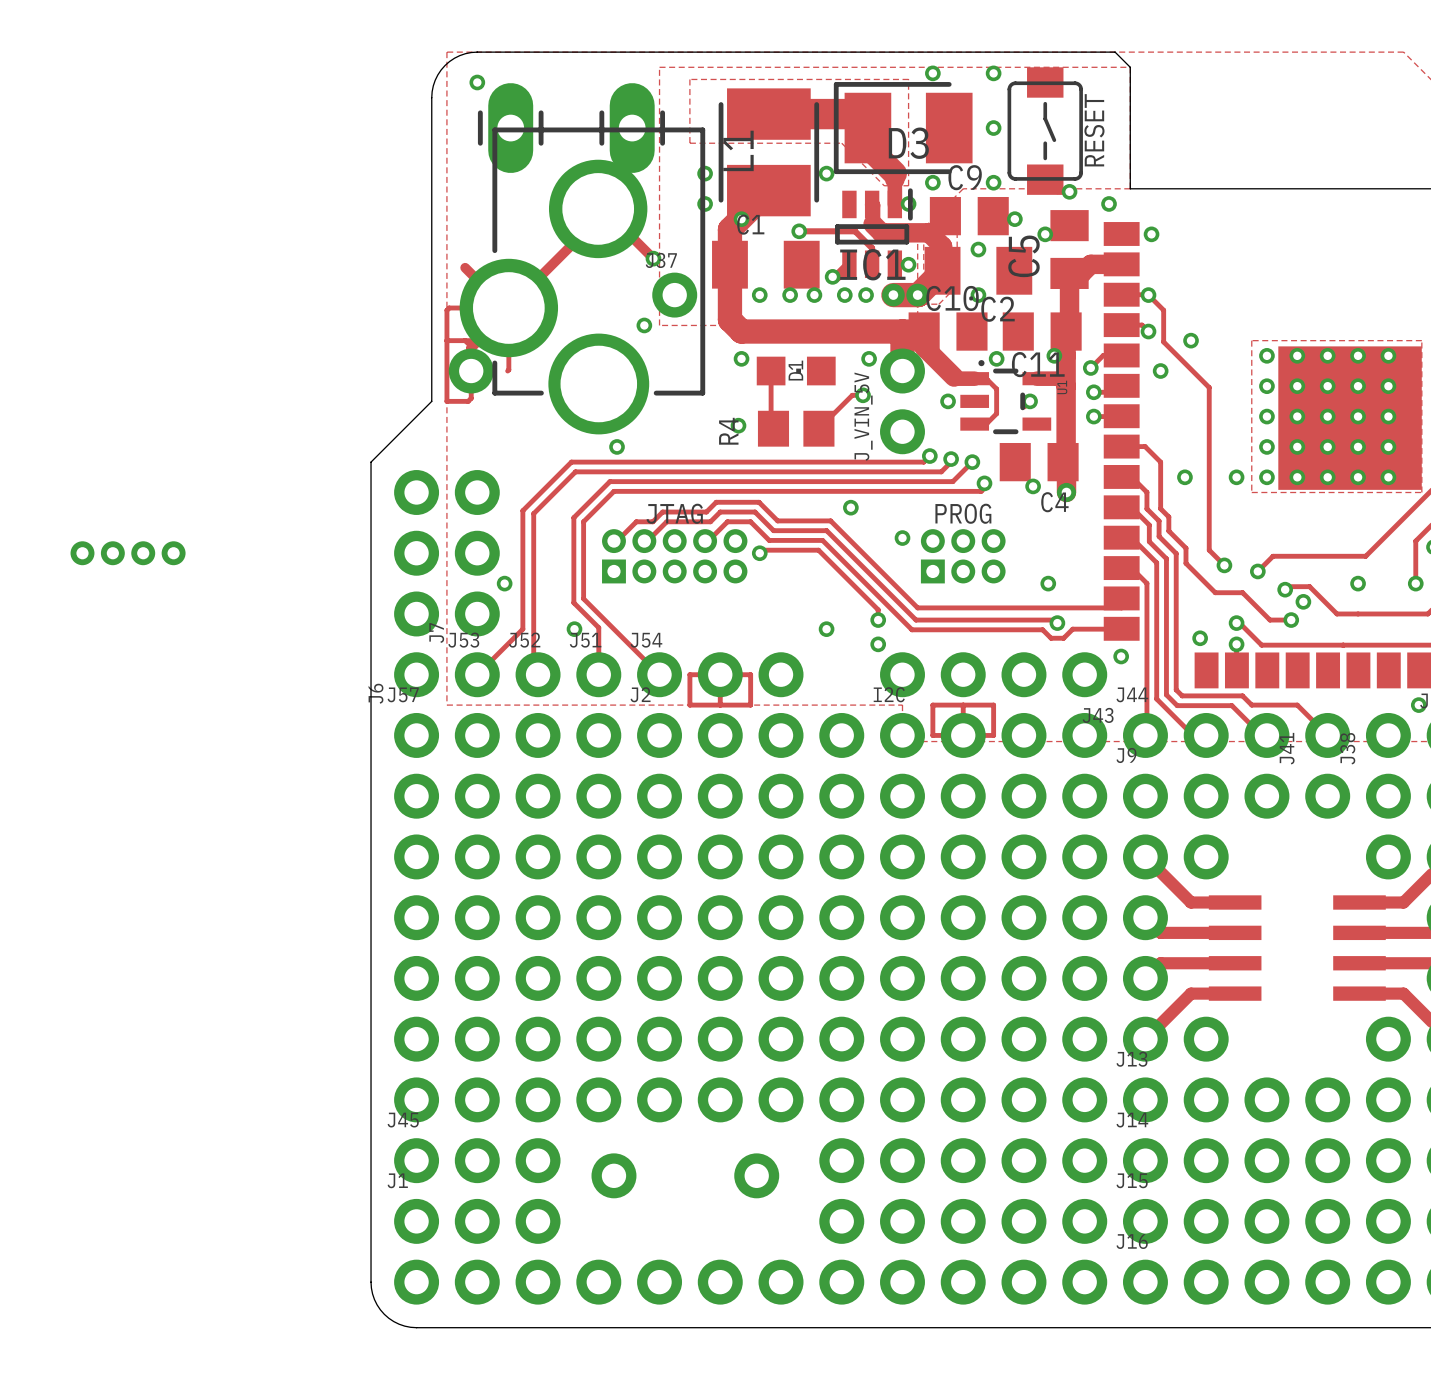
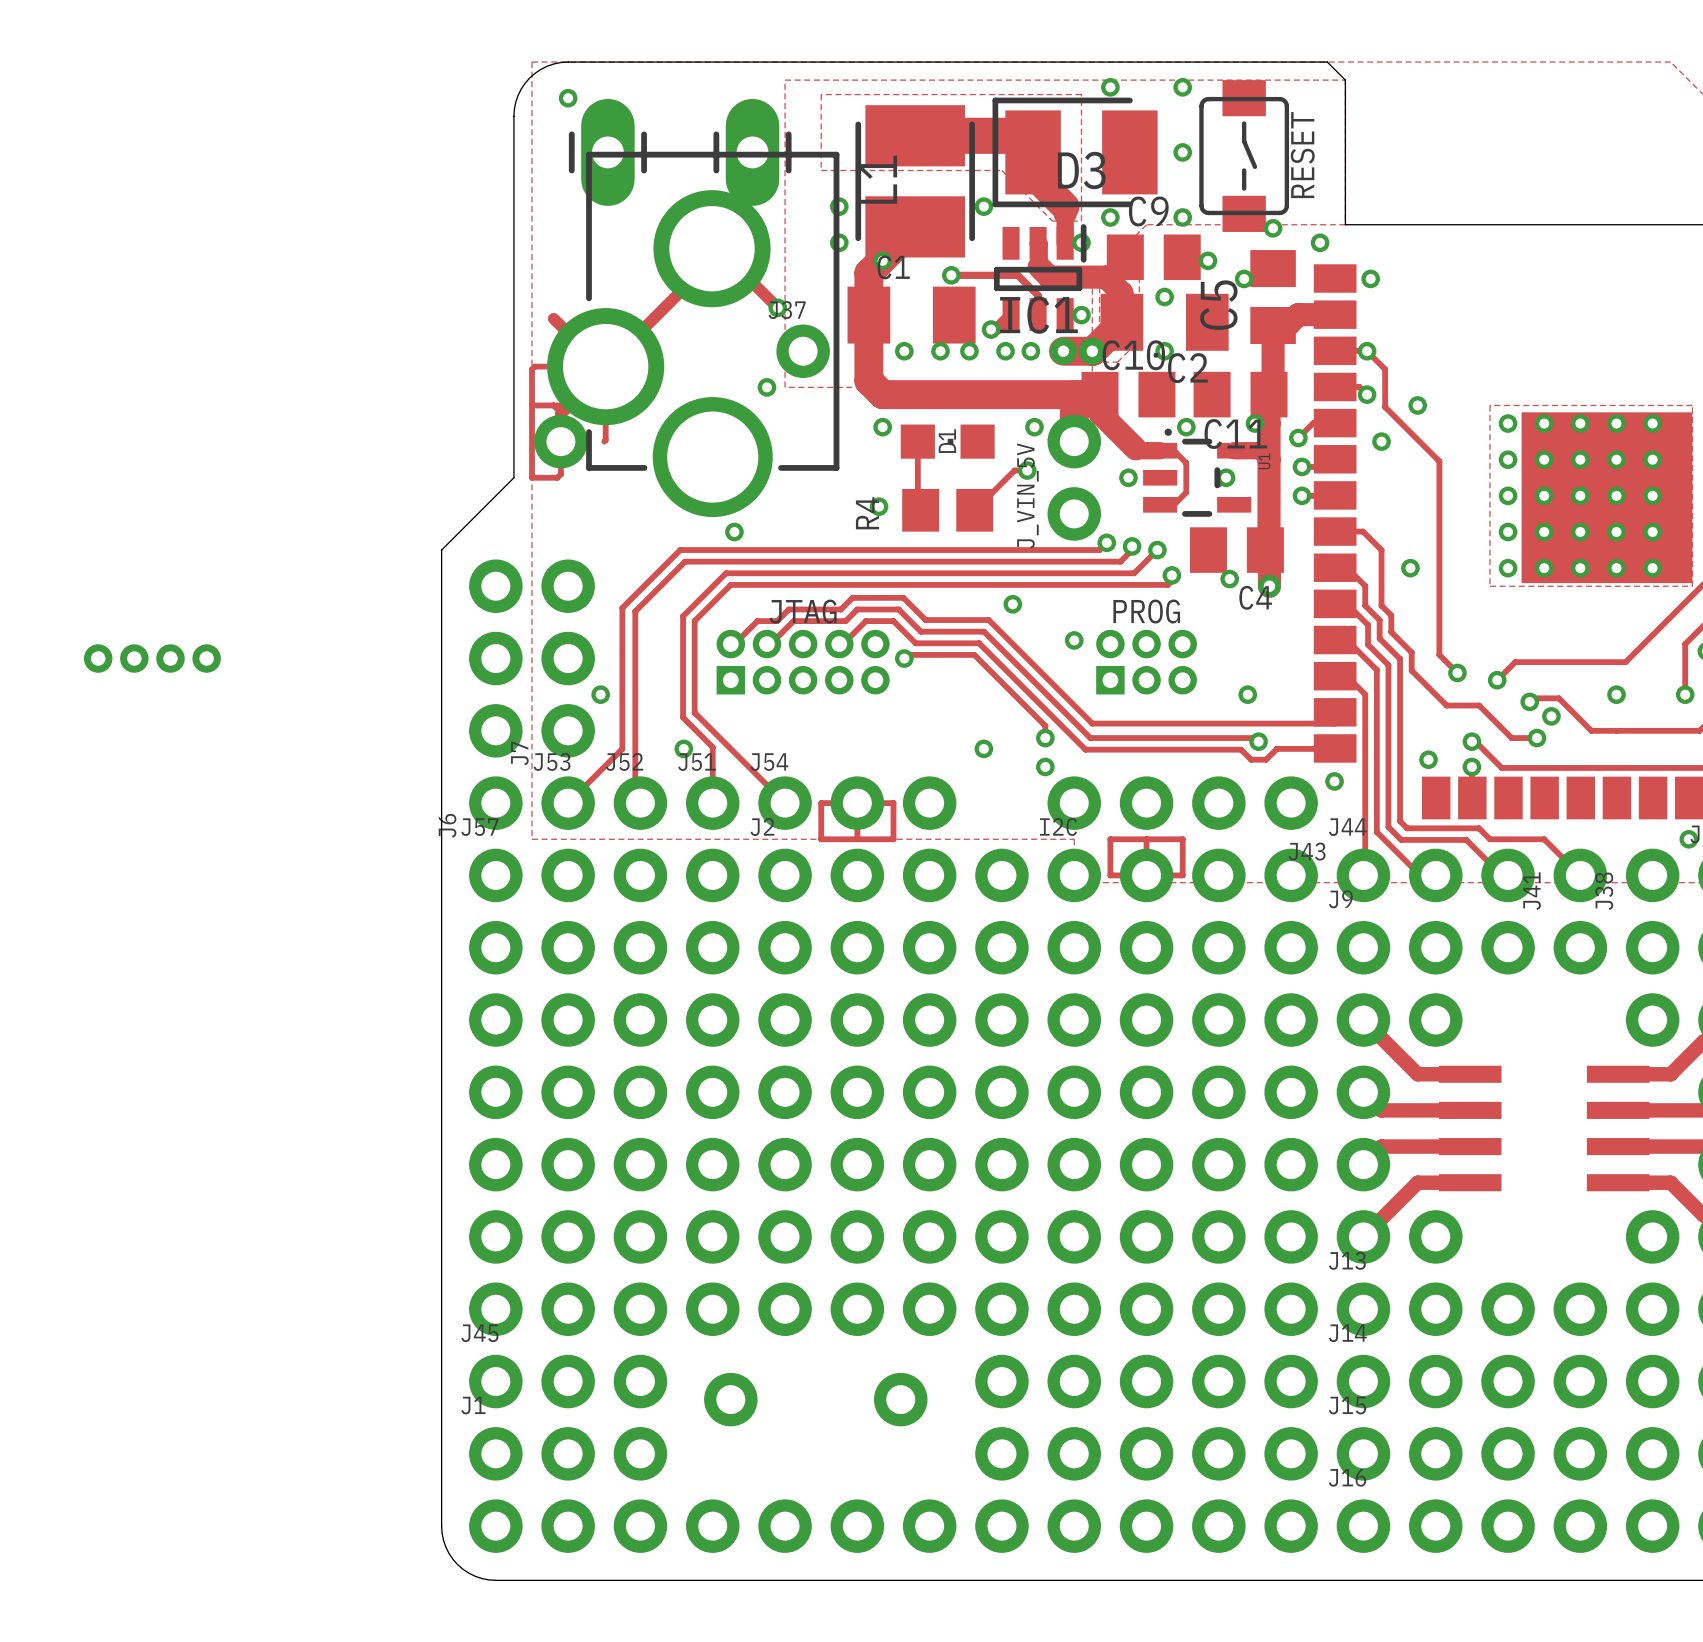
via: (1236, 477) -> none

